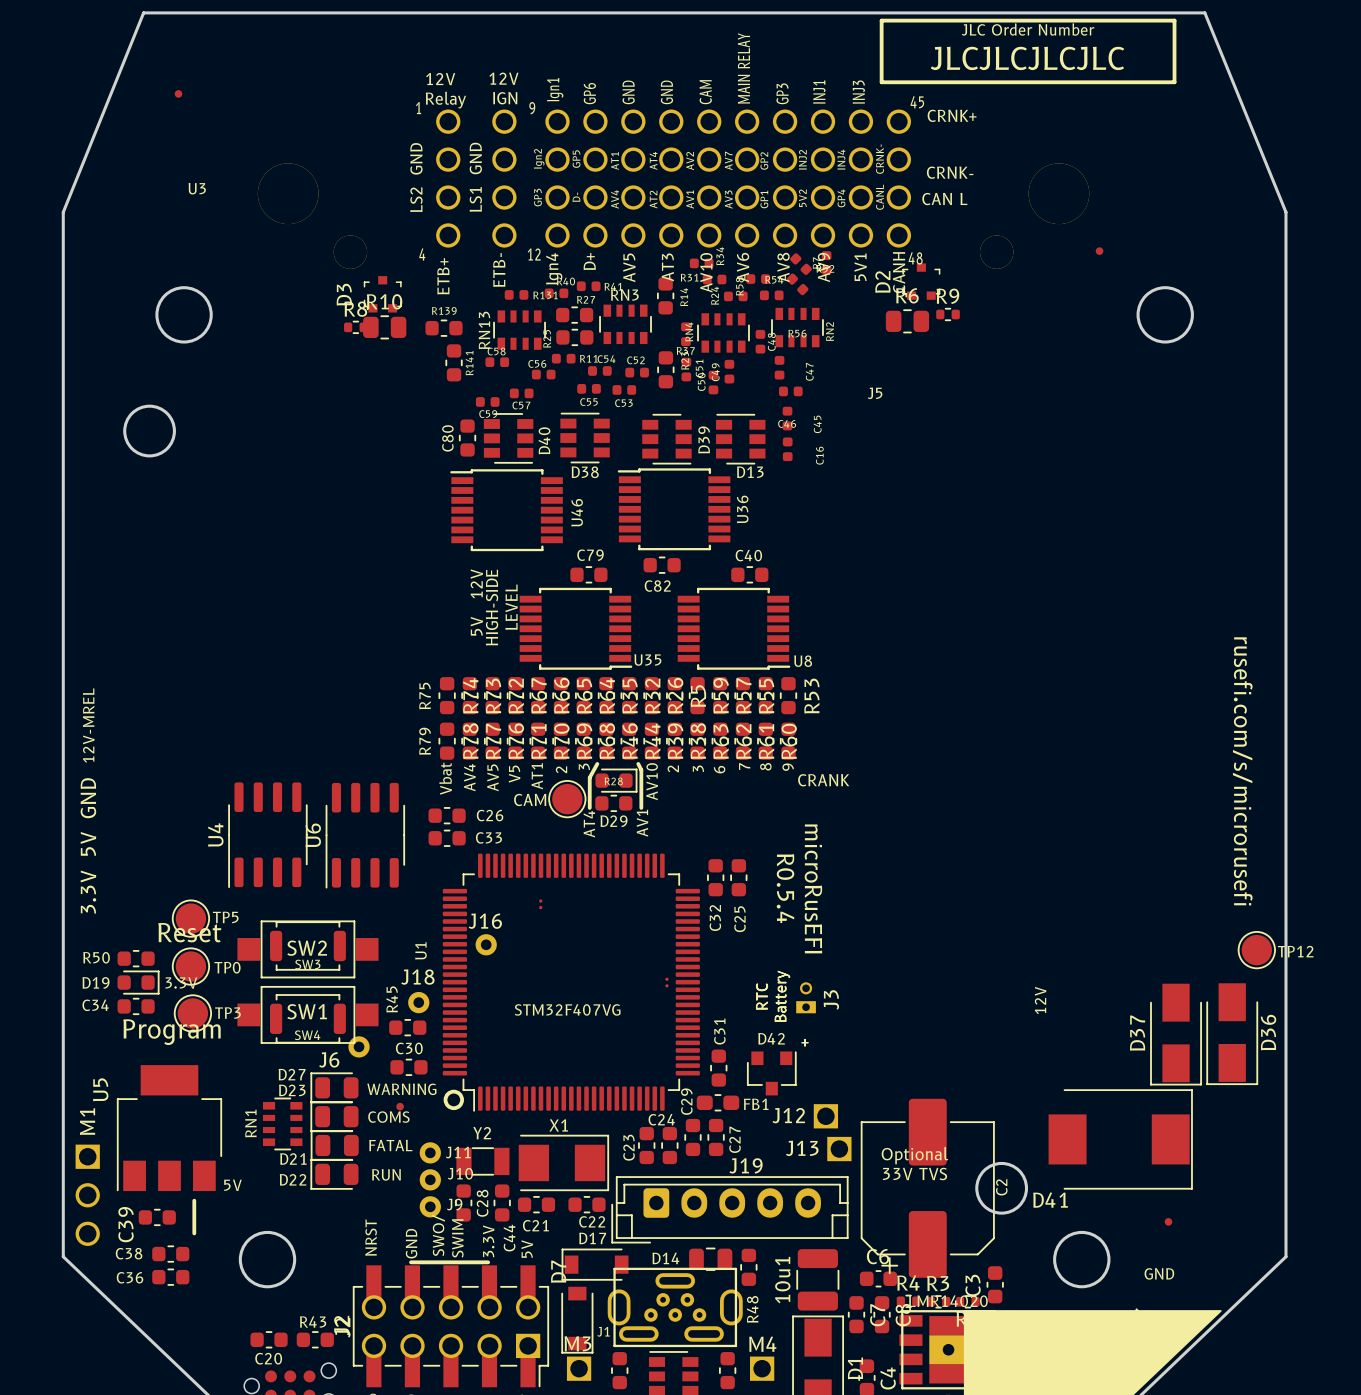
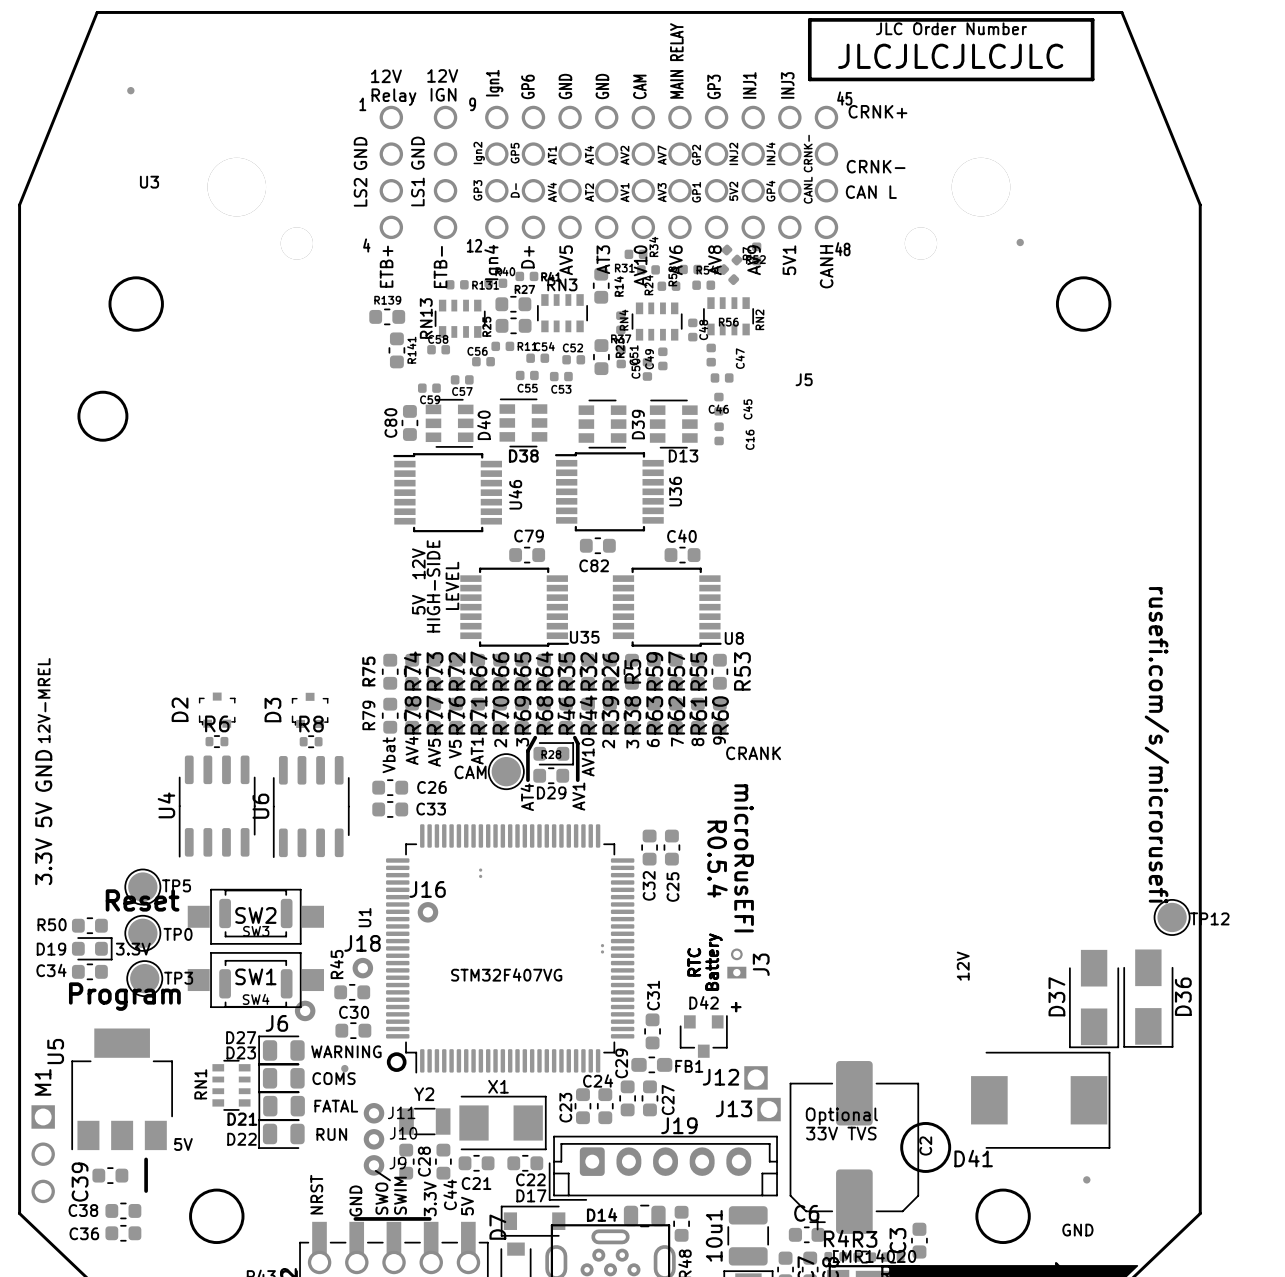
D2 position: (921, 281) -> (217, 710)
D3 position: (382, 294) -> (310, 710)
R6 footprint: [885, 309, 930, 334] -> [205, 735, 229, 749]
R9: (948, 314) -> none
R8 position: (355, 327) -> (311, 741)
R10: (384, 327) -> none

